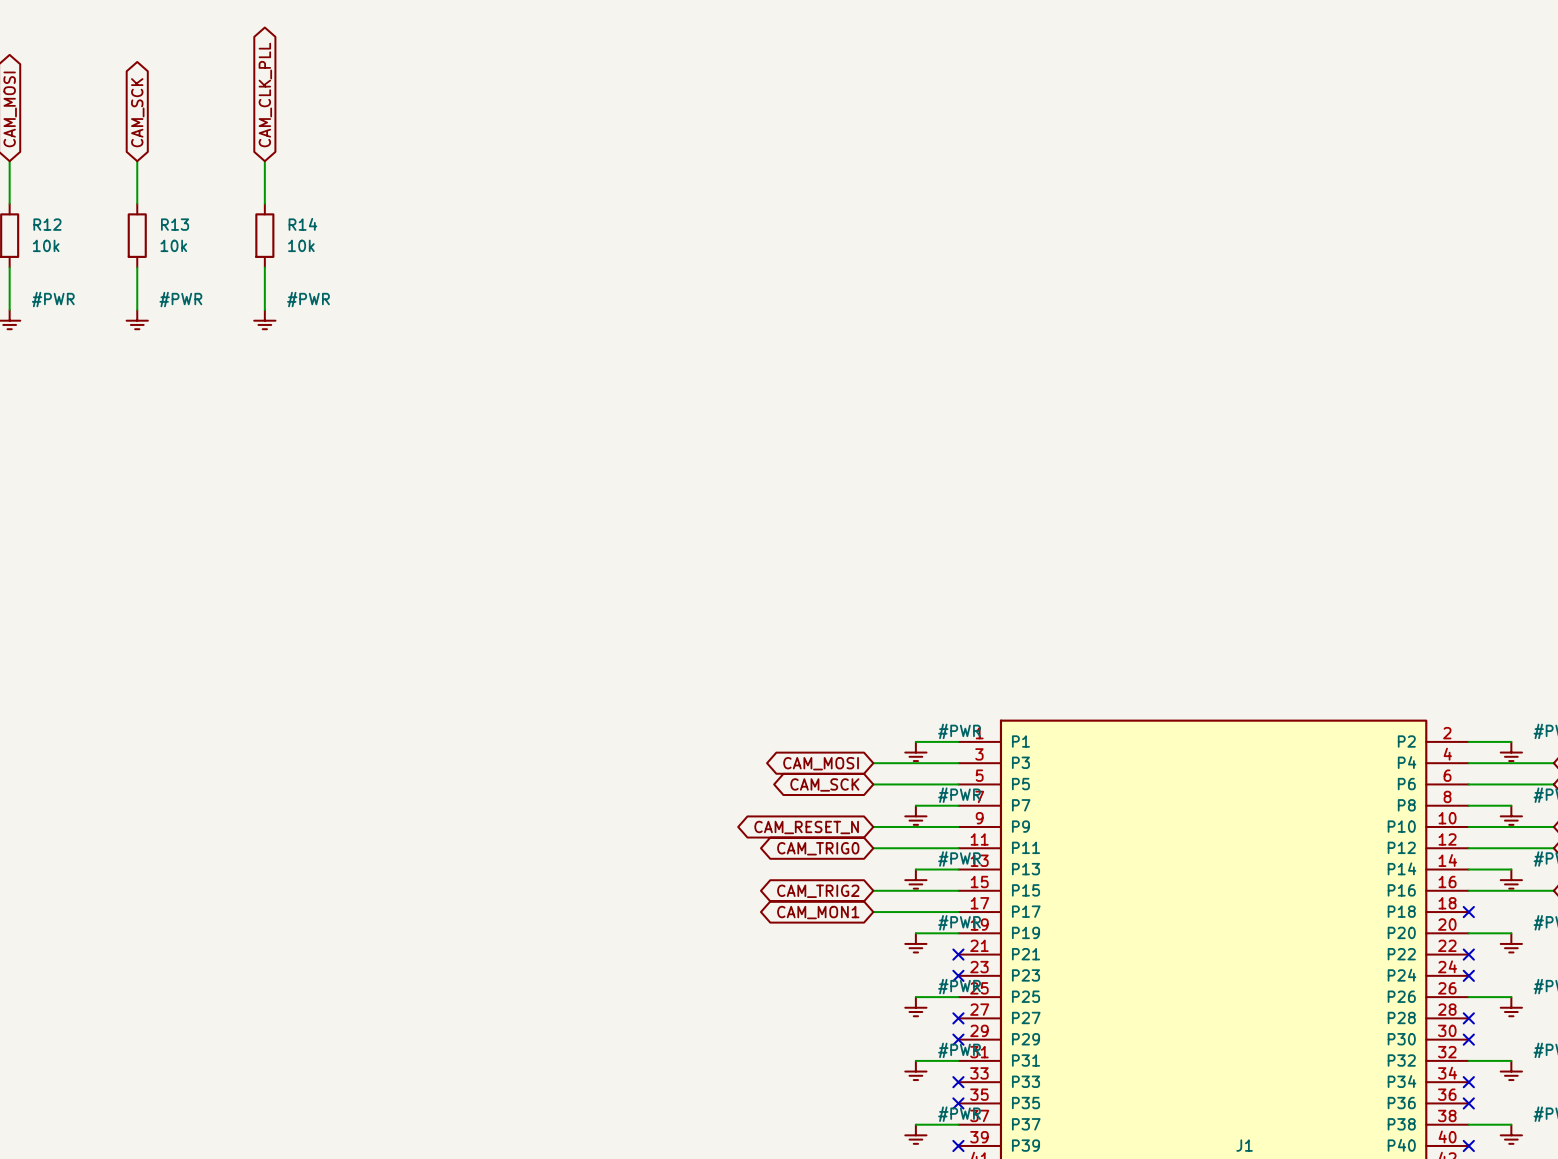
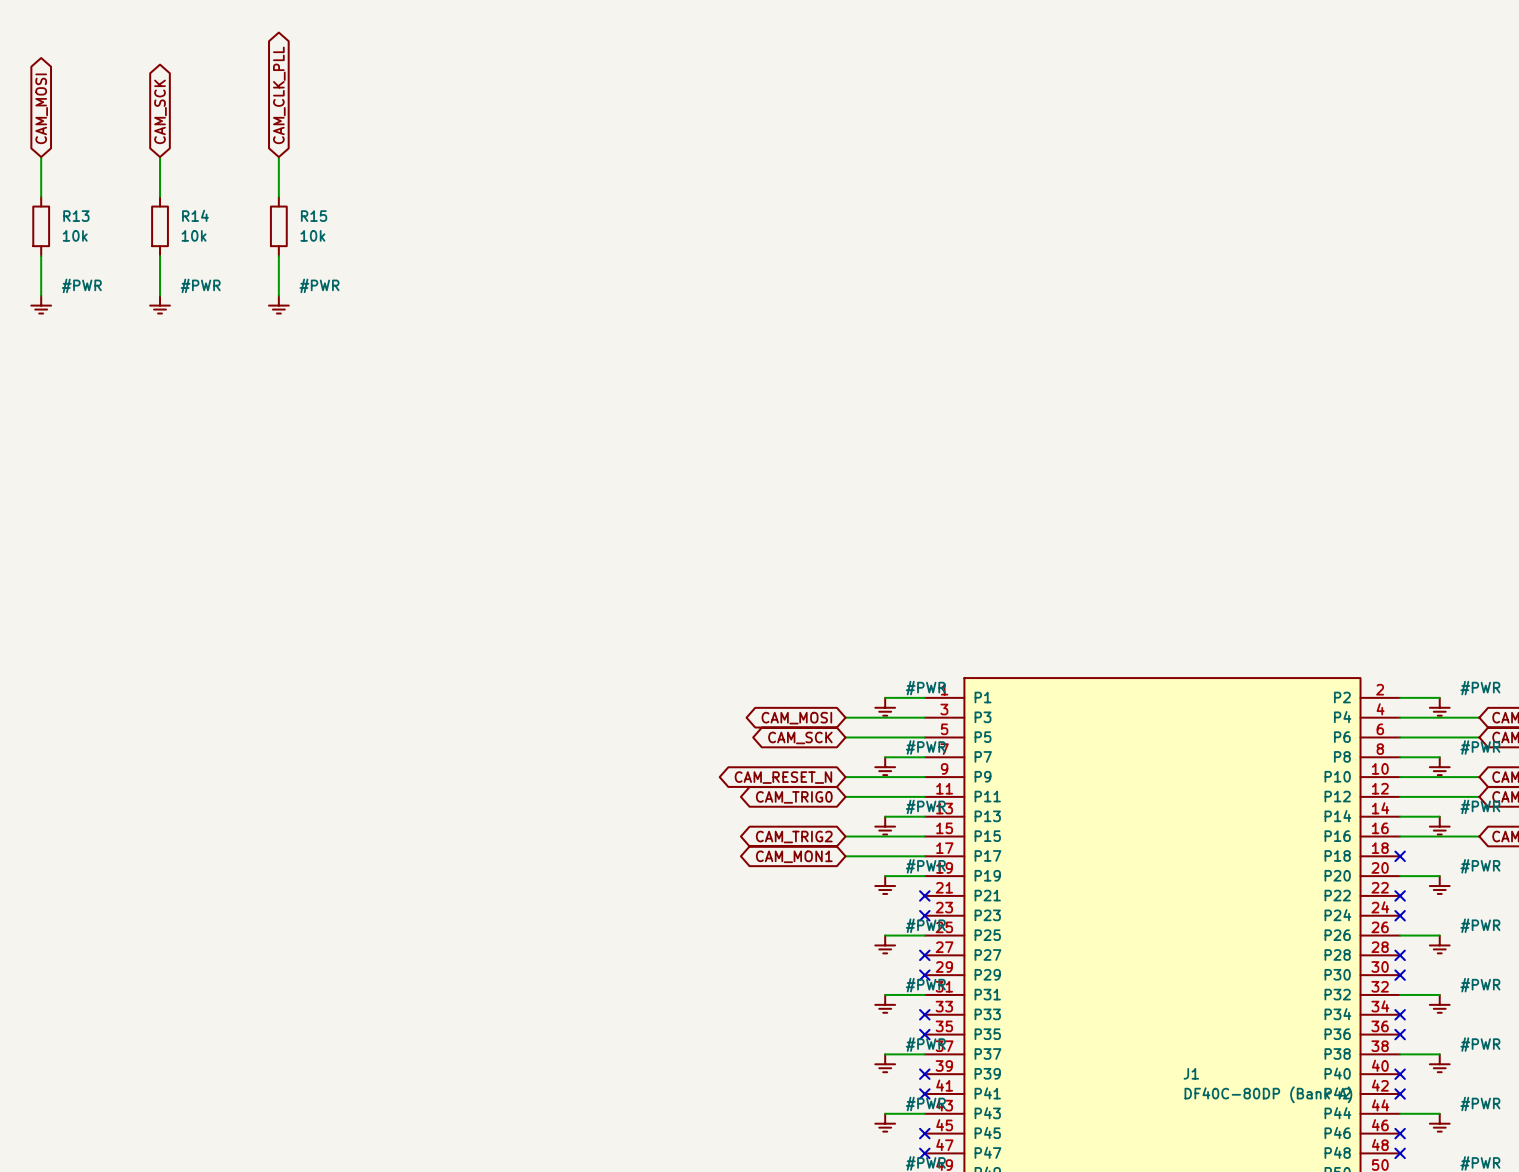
R12 name: R12 (47, 224) -> R13 (76, 216)
R13 name: R13 (175, 224) -> R14 (195, 215)
R14 name: R14 (302, 224) -> R15 (314, 216)

